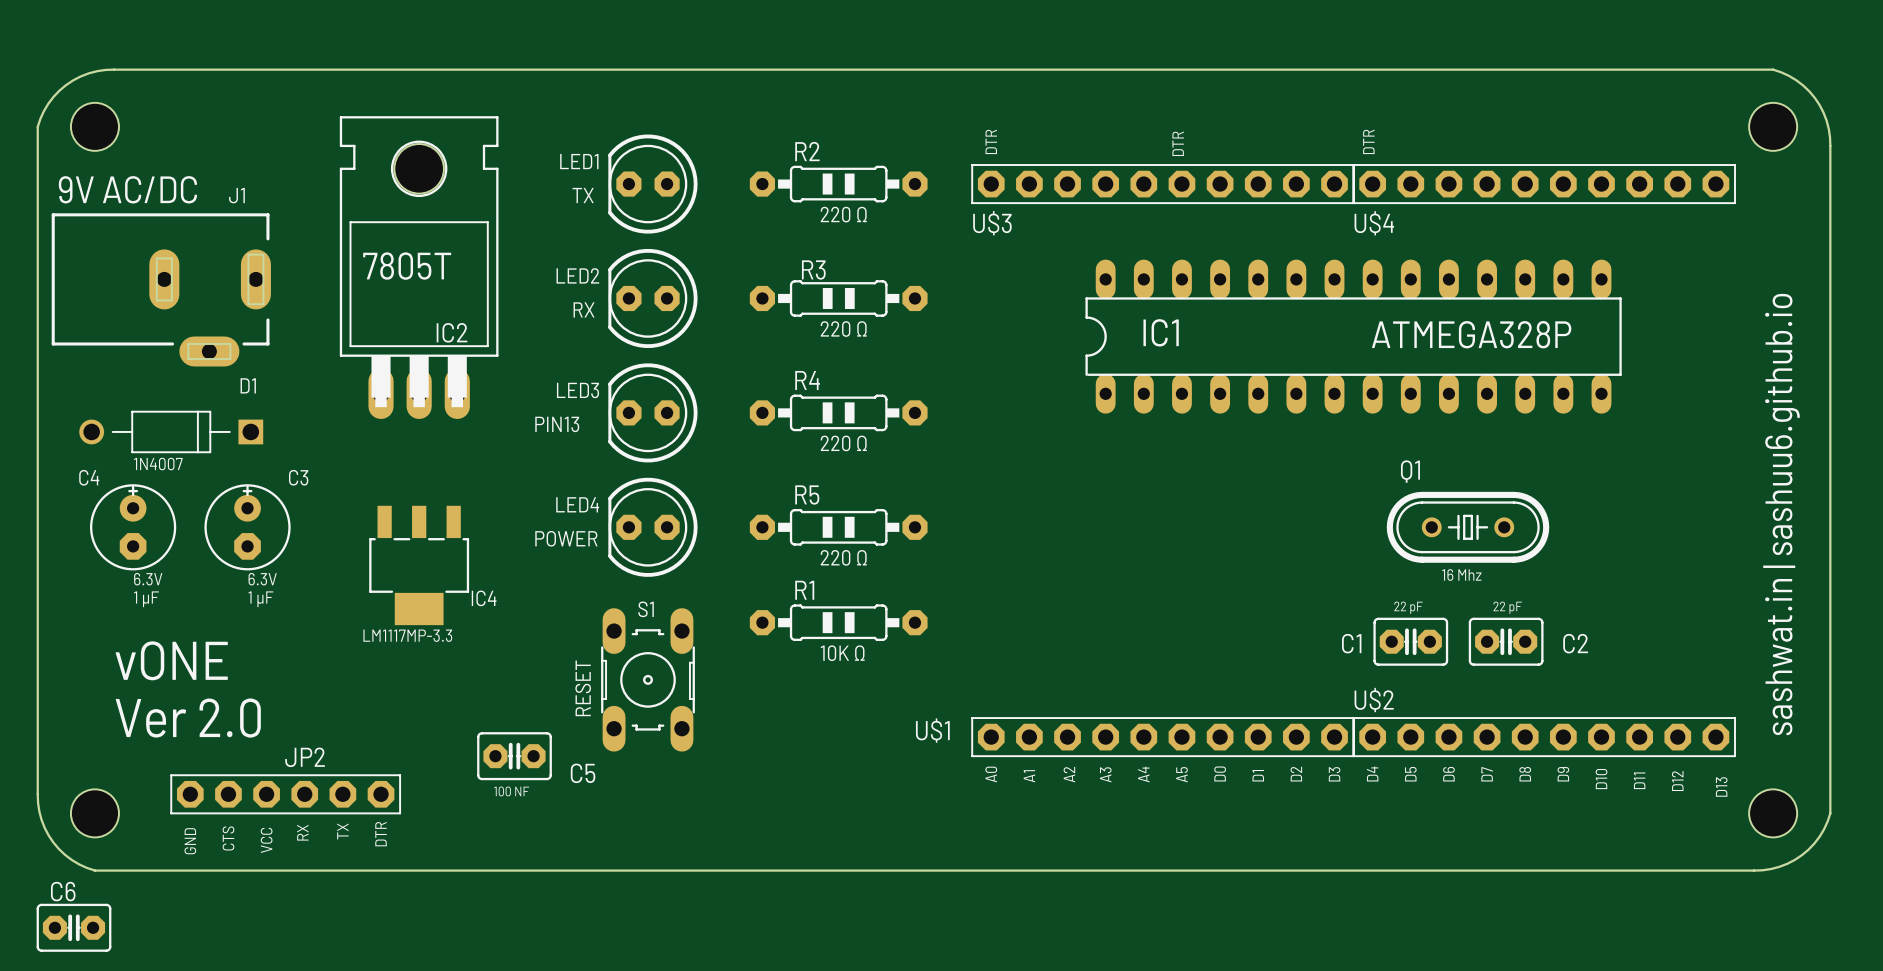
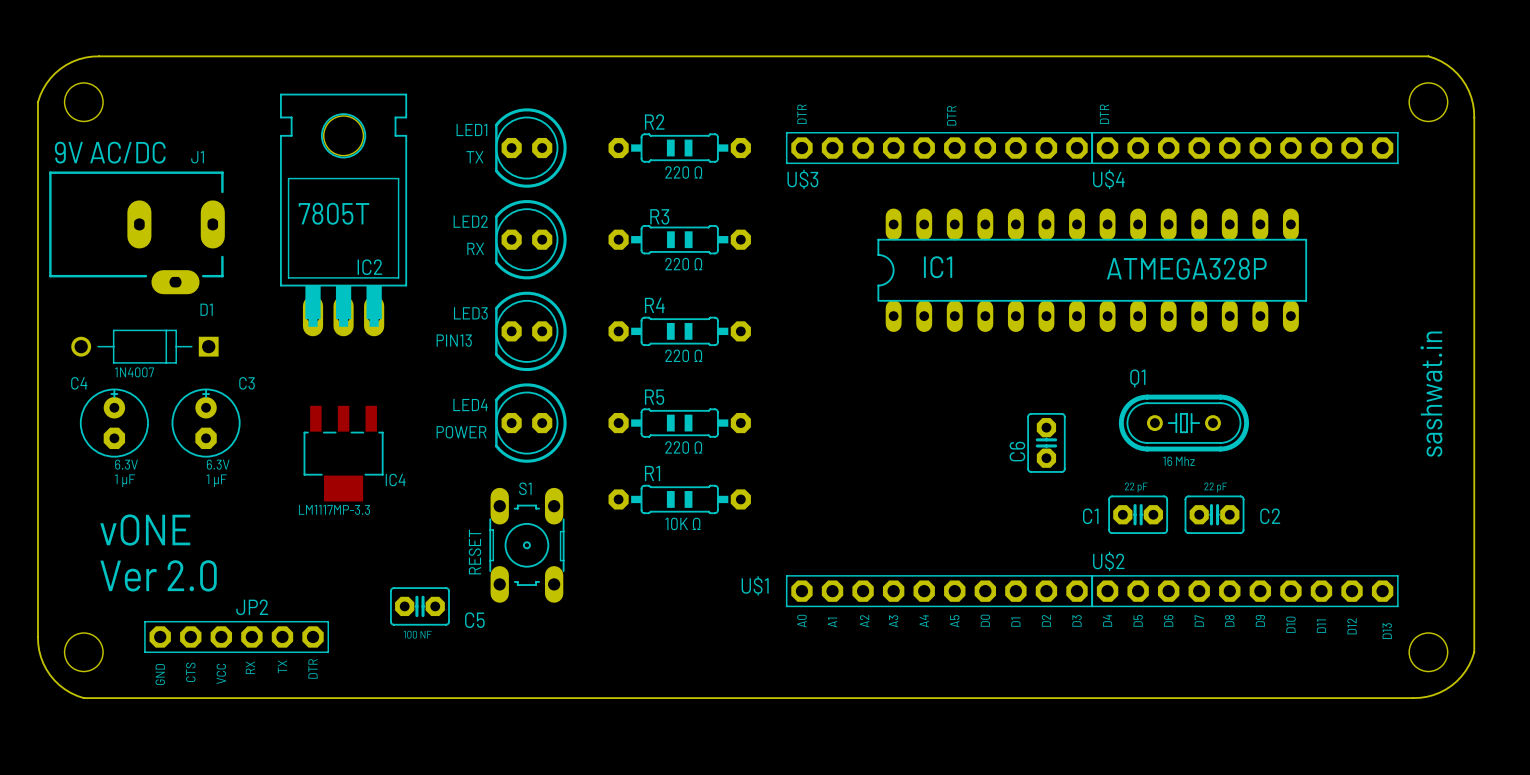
text: none -> sashwat.in (1431, 394)
text: sashwat.in | sashuu6.github.io (1781, 514) -> none
C6 name position: C6 (63, 891) -> C6 (1017, 451)
C6 rotation: 0° (73, 927) -> 90° clockwise (1046, 442)
C6 position: (73, 927) -> (1046, 442)

